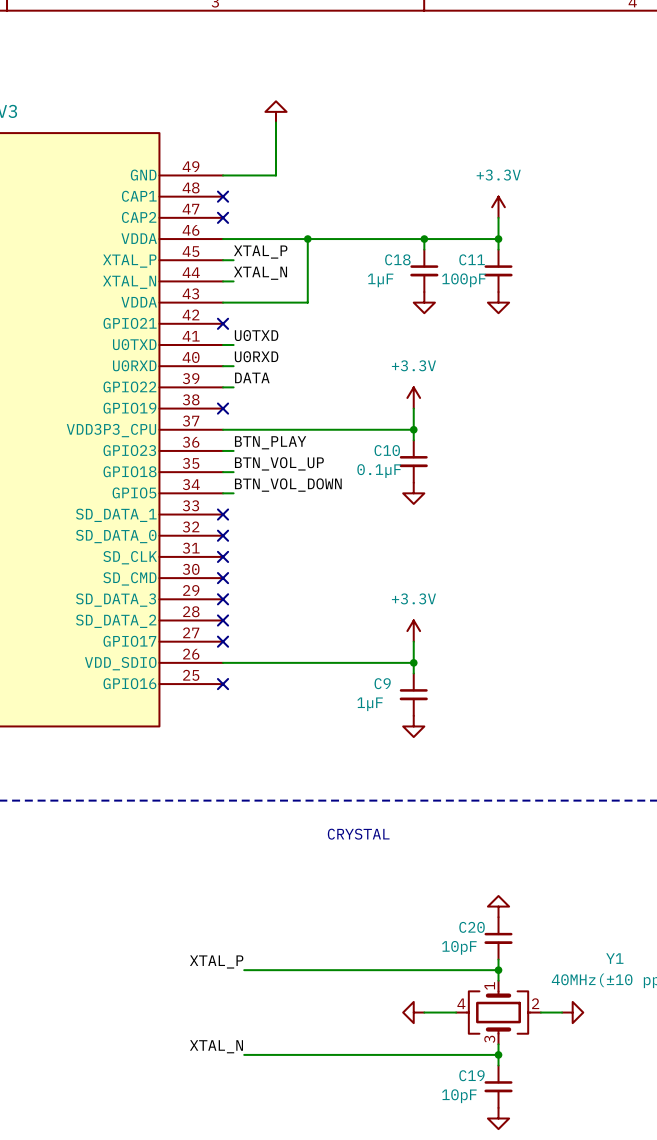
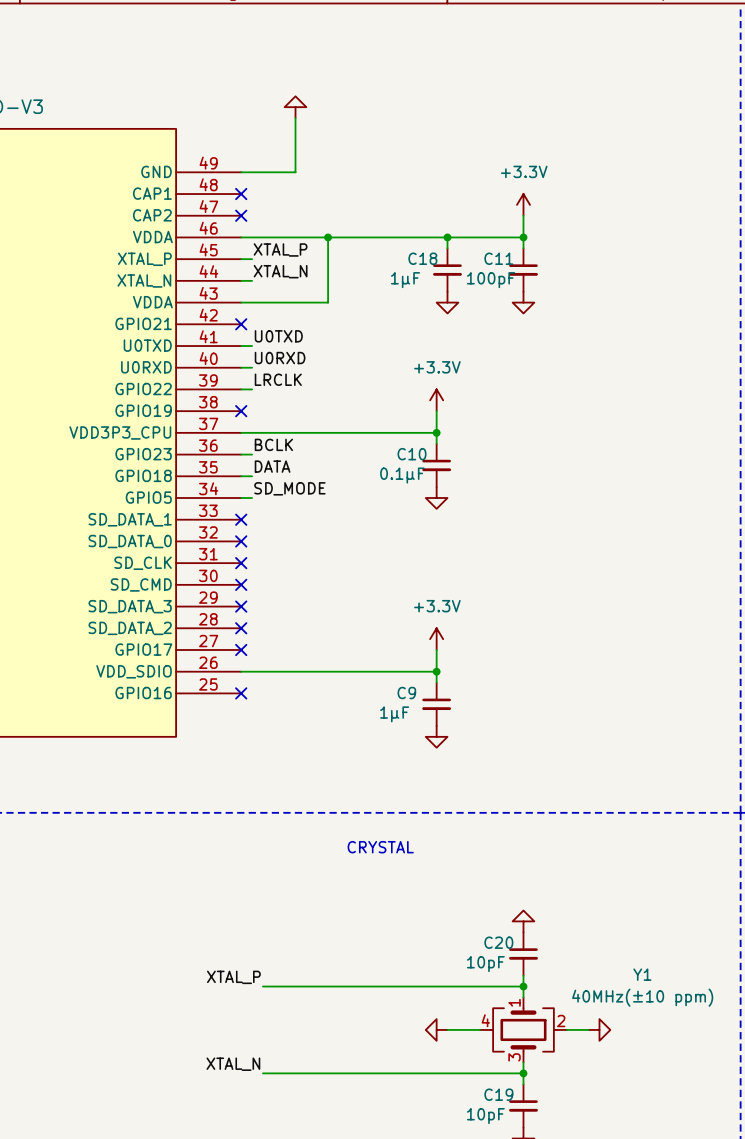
label: DATA (252, 377) -> LRCLK (278, 379)
label: BTN_PLAY (270, 442) -> BCLK (273, 444)
label: BTN_VOL_UP (279, 463) -> DATA (272, 466)
label: BTN_VOL_DOWN (288, 485) -> SD_MODE (289, 488)

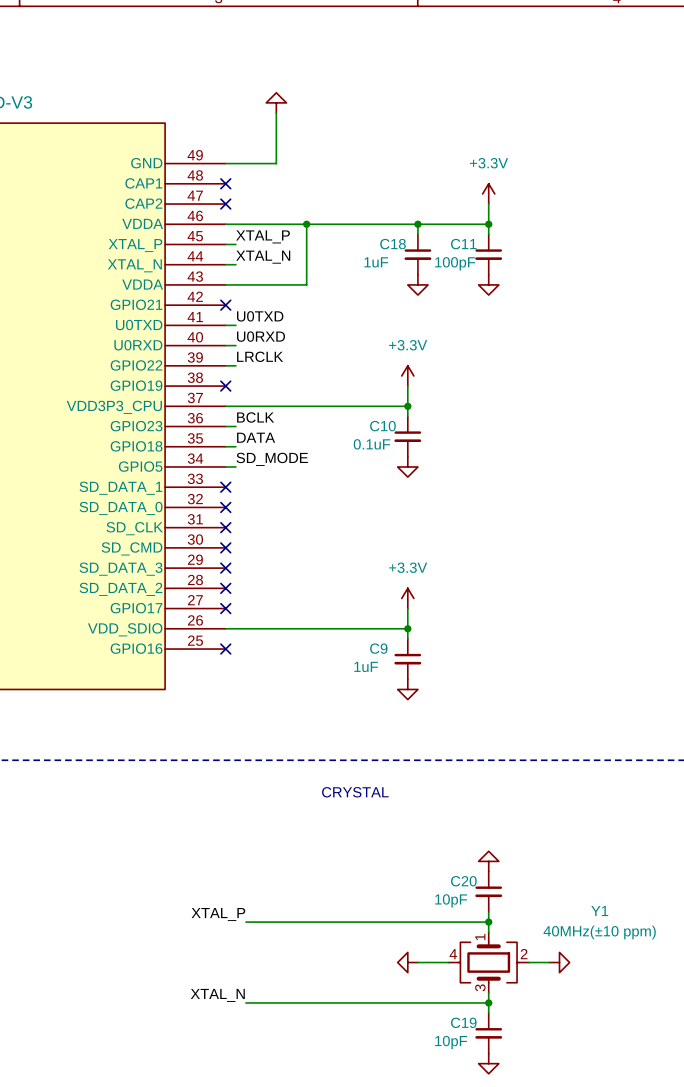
C18 value: 1µF (405, 280) -> 1uF (376, 262)
C10 value: 0.1µF (402, 475) -> 0.1uF (371, 444)
C9 value: 1µF (394, 714) -> 1uF (366, 666)

